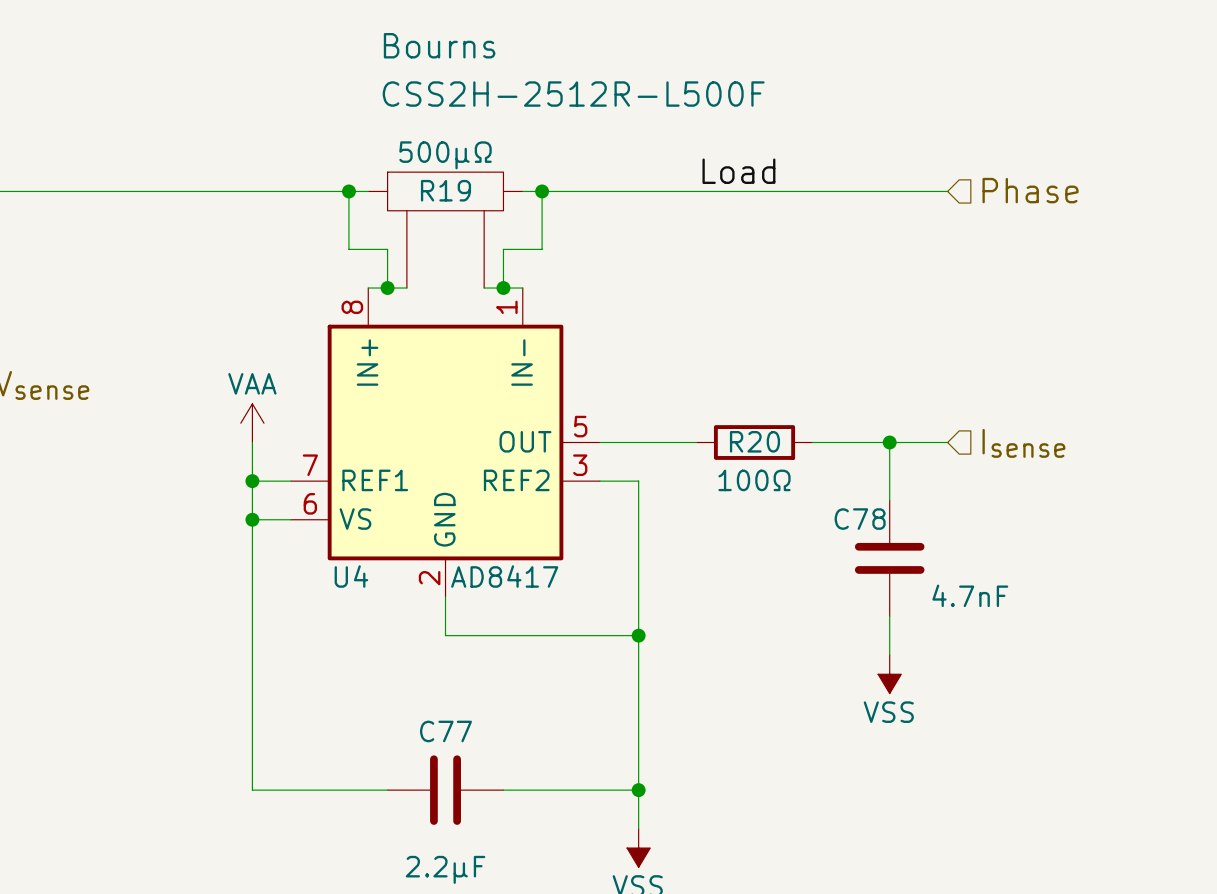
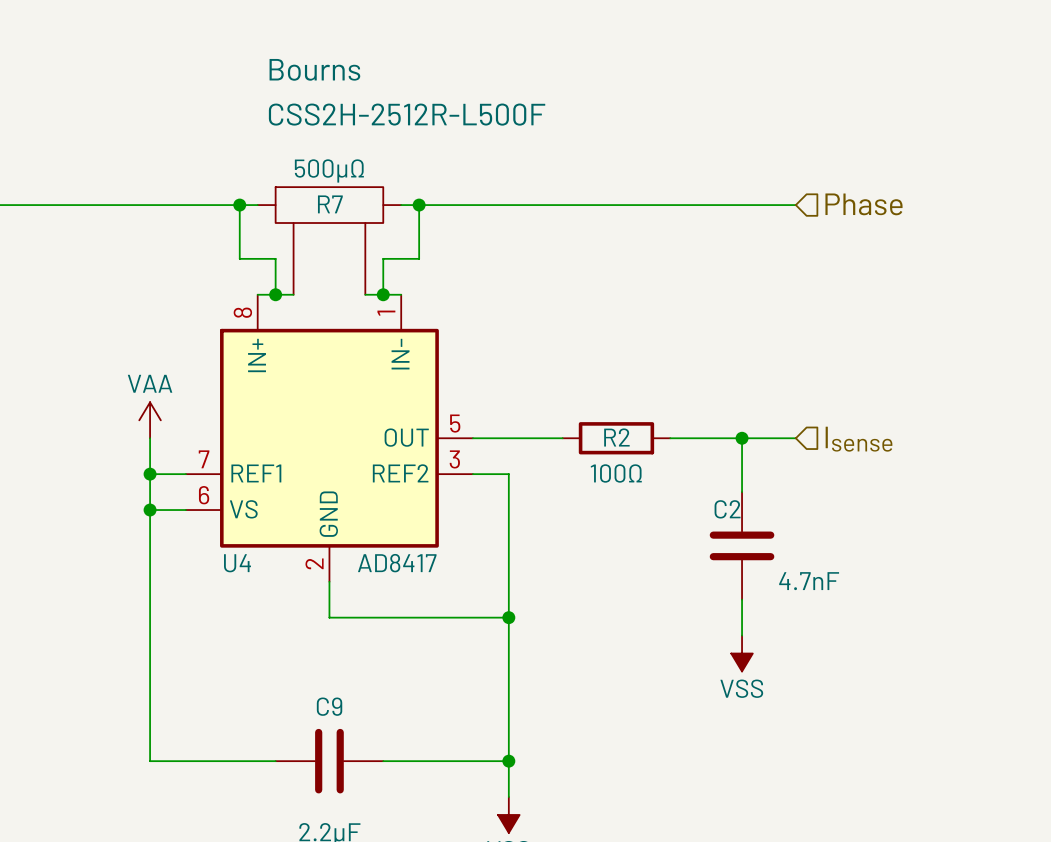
label: Load (738, 171) -> none
R19 name: R19 (445, 190) -> R7 (330, 204)
R20 name: R20 (754, 441) -> R2 (616, 437)
C78 name: C78 (860, 519) -> C2 (727, 509)
C77 name: C77 (445, 731) -> C9 (329, 706)

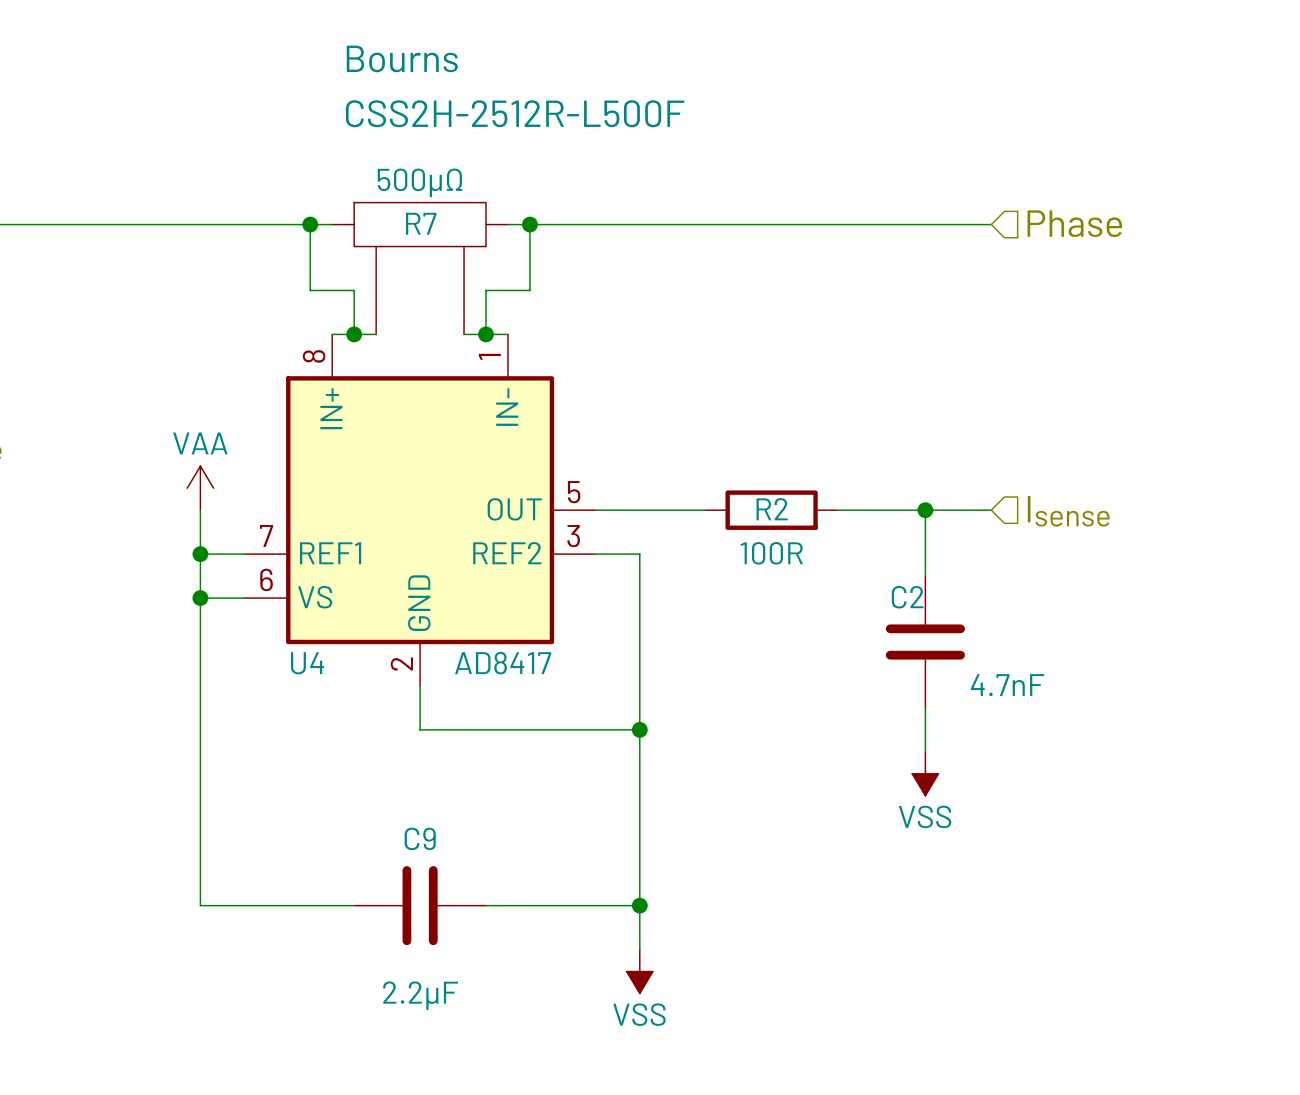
R2 value: 100Ω (616, 473) -> 100R (771, 553)

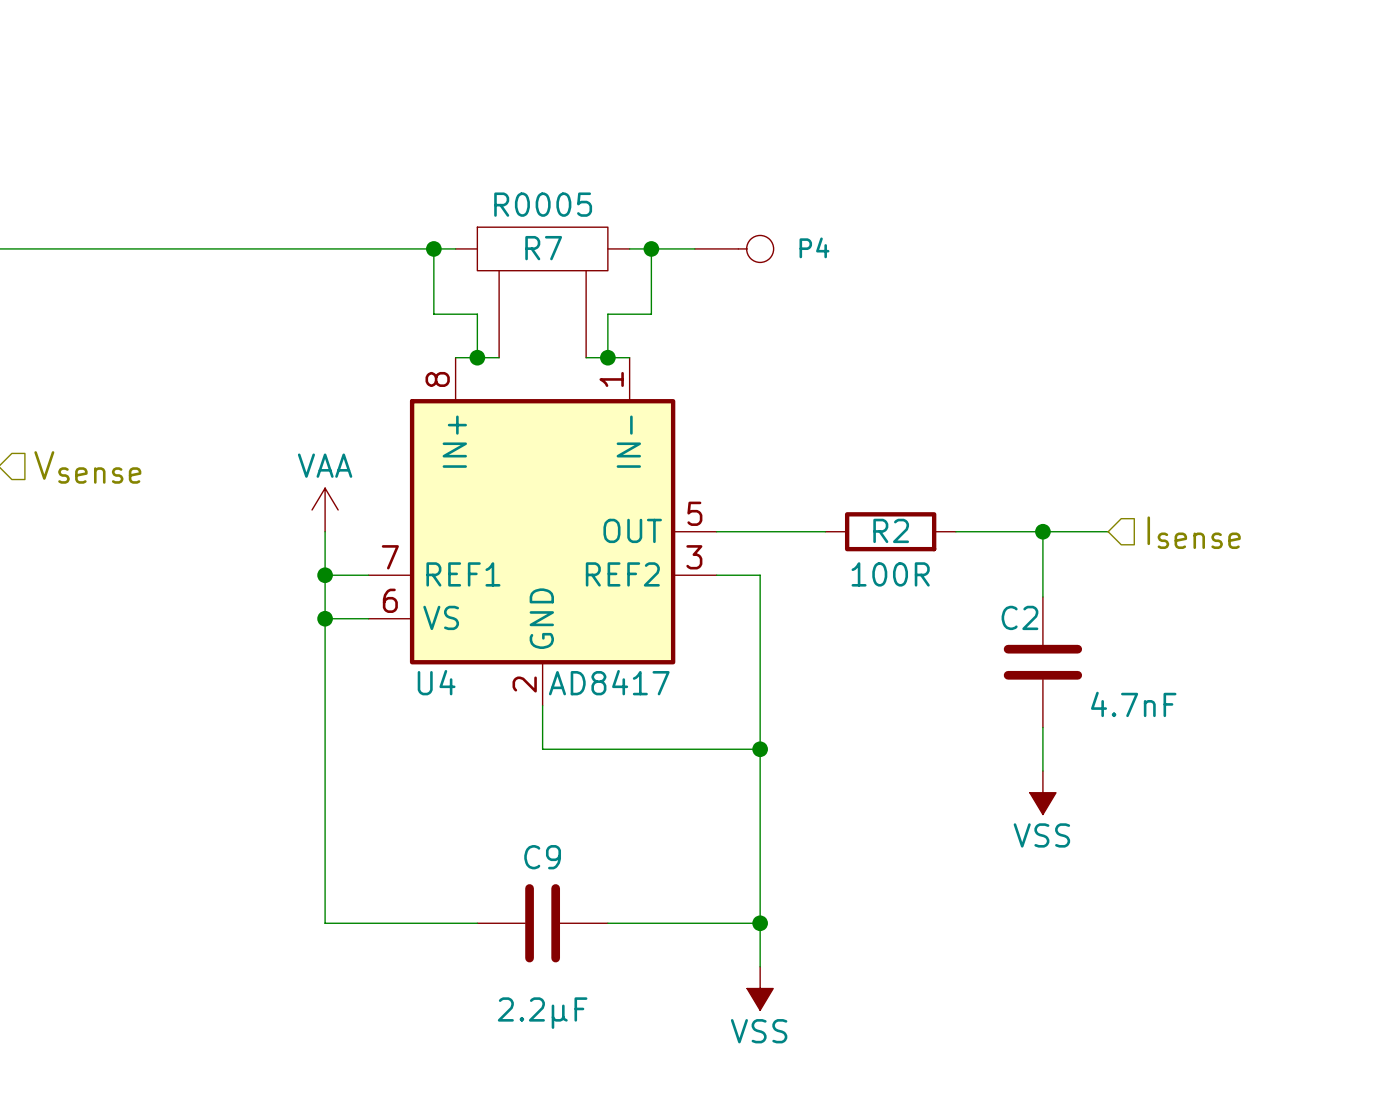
R7 text: Bourns (402, 58) -> none
R7 text: CSS2H-2512R-L500F (515, 113) -> none
R7 value: 500µΩ (420, 182) -> R0005 (543, 204)
hierarchical label: Phase (1074, 223) -> none
wire: (573, 224) (991, 224) -> none
P4: none -> (734, 248)

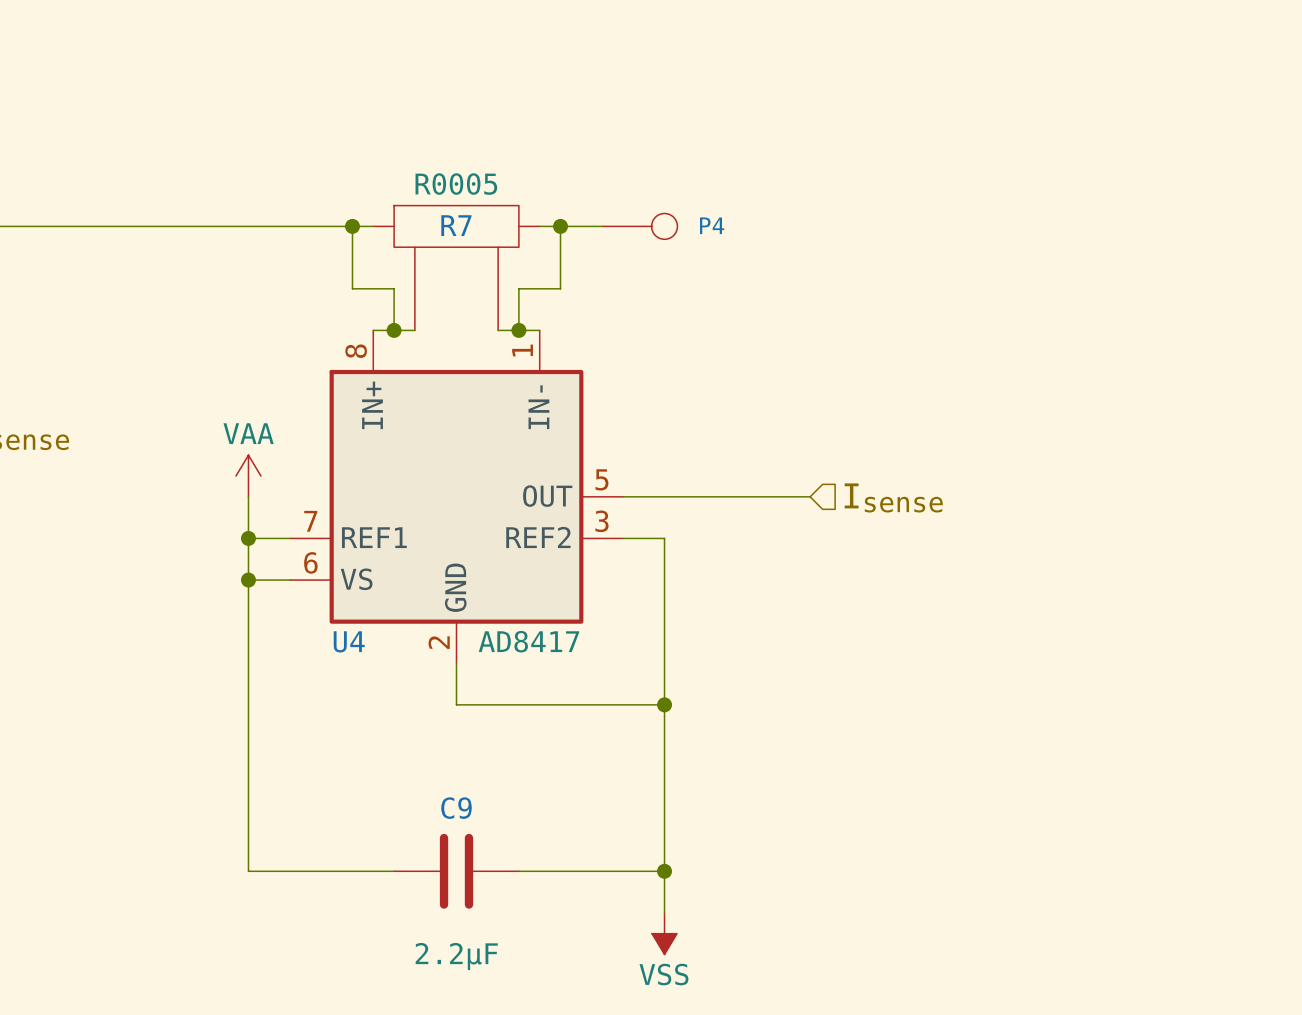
wire: none -> (726, 496) (810, 496)
R2: 100R (890, 531) -> none
wire: (955, 531) (1108, 531) -> none
wire: (1042, 531) (1042, 596) -> none
junction: (1042, 531) -> none
hierarchical label position: Isense (1194, 532) -> Isense (893, 497)
C2: 4.7nF (1042, 662) -> none
wire: (1042, 727) (1042, 771) -> none
power symbol: VSS (1042, 792) -> none

